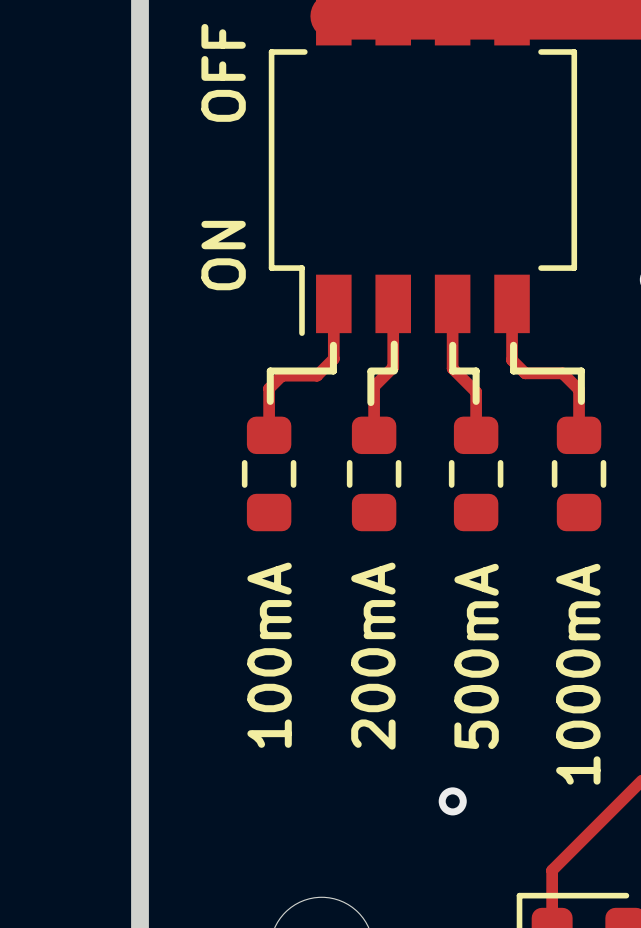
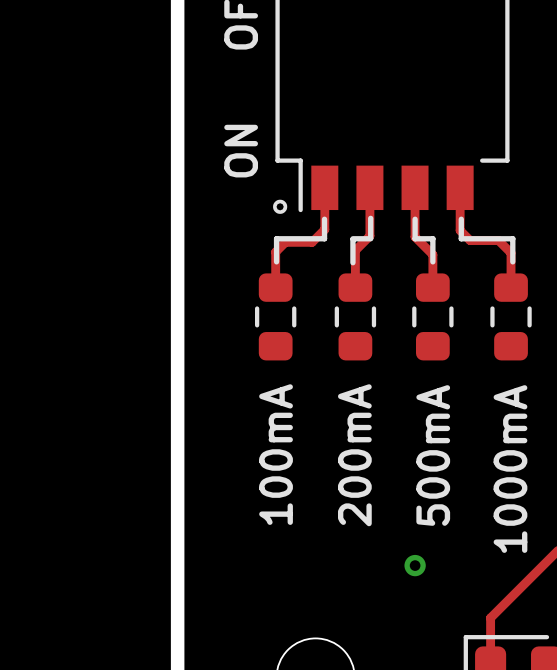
drawing: none -> [273, 199, 288, 214]

